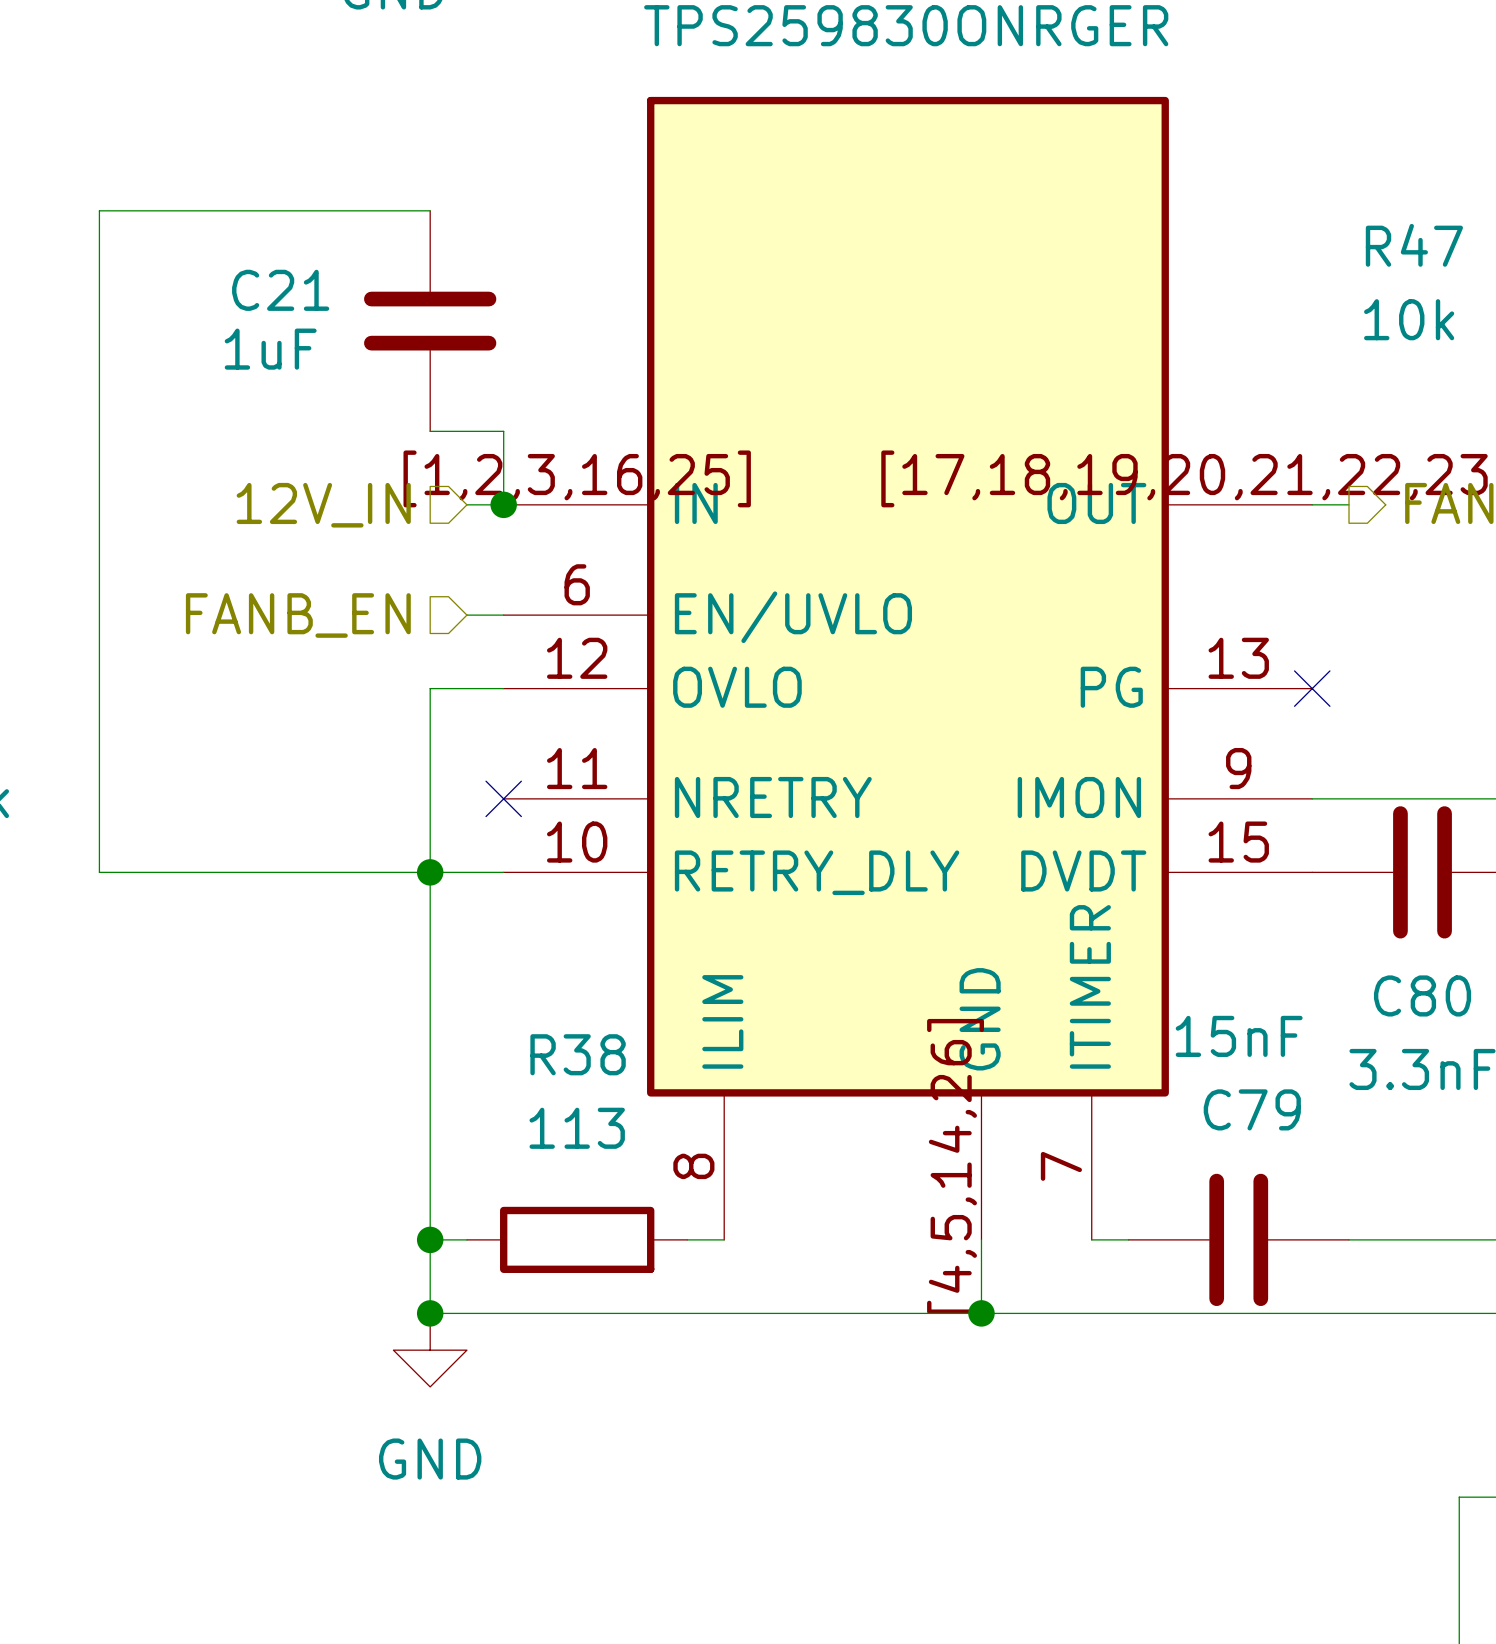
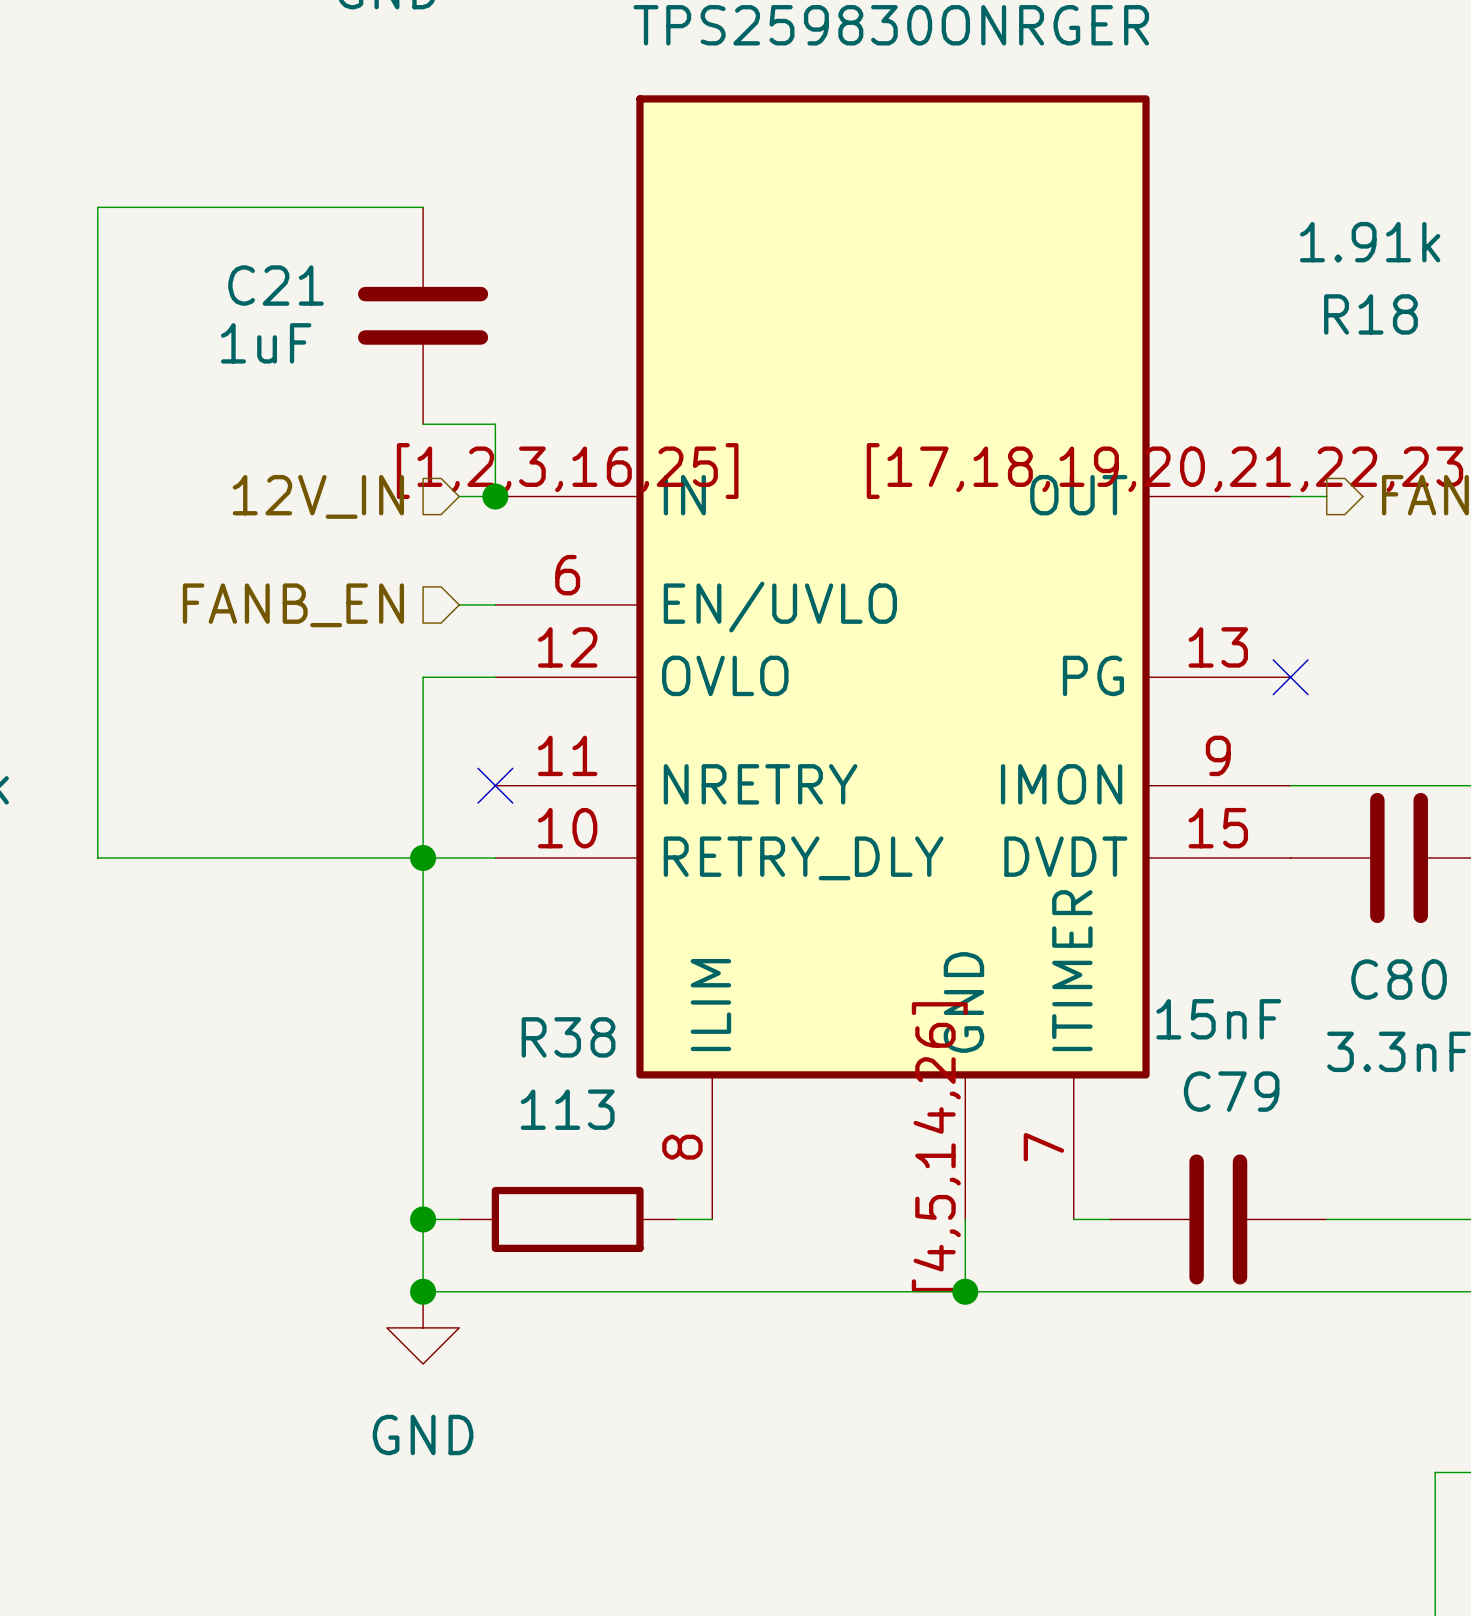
R47 name: R47 (1414, 245) -> R18 (1370, 314)
R47 value: 10k (1409, 319) -> 1.91k (1370, 242)

